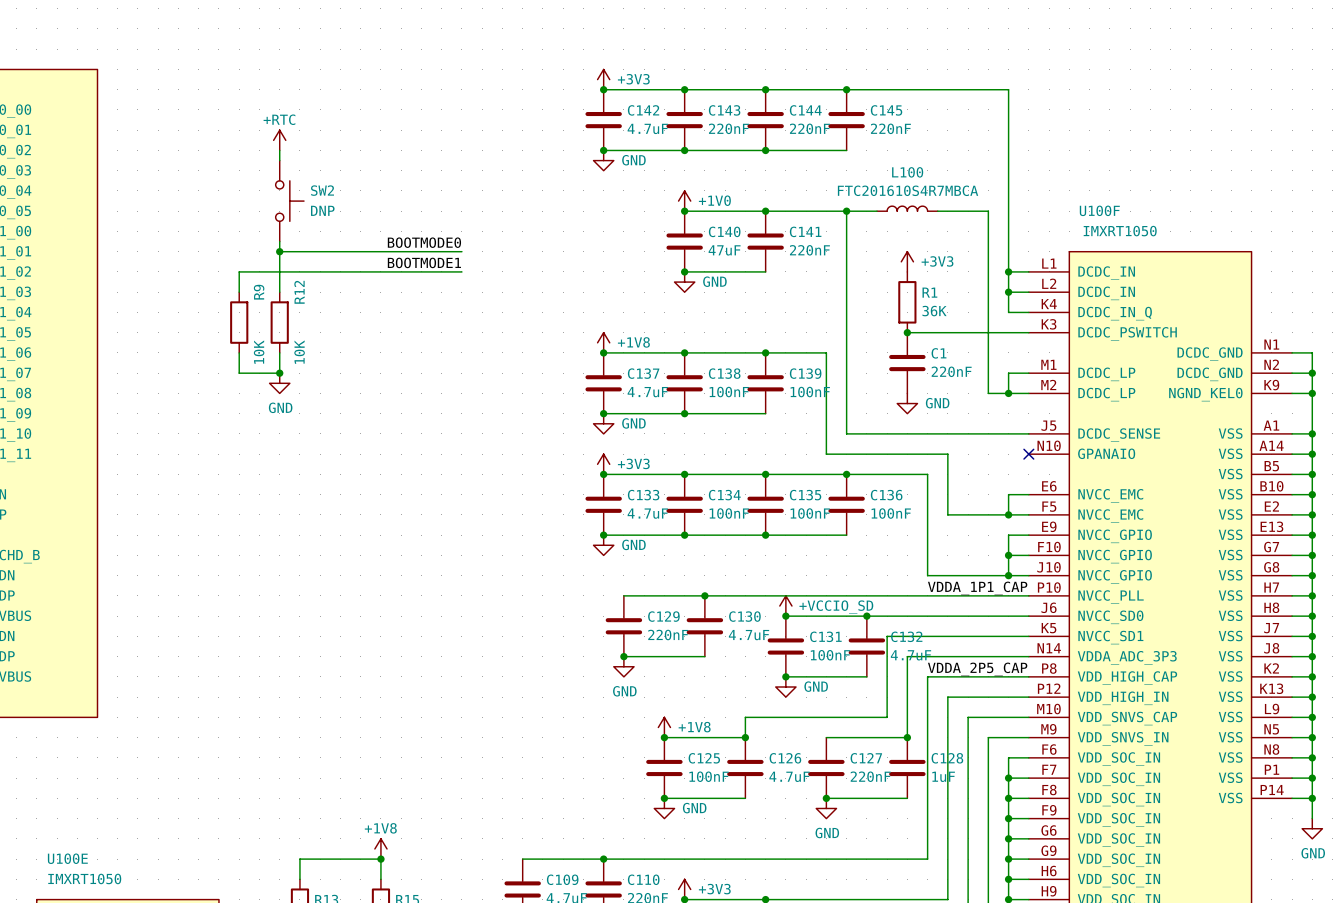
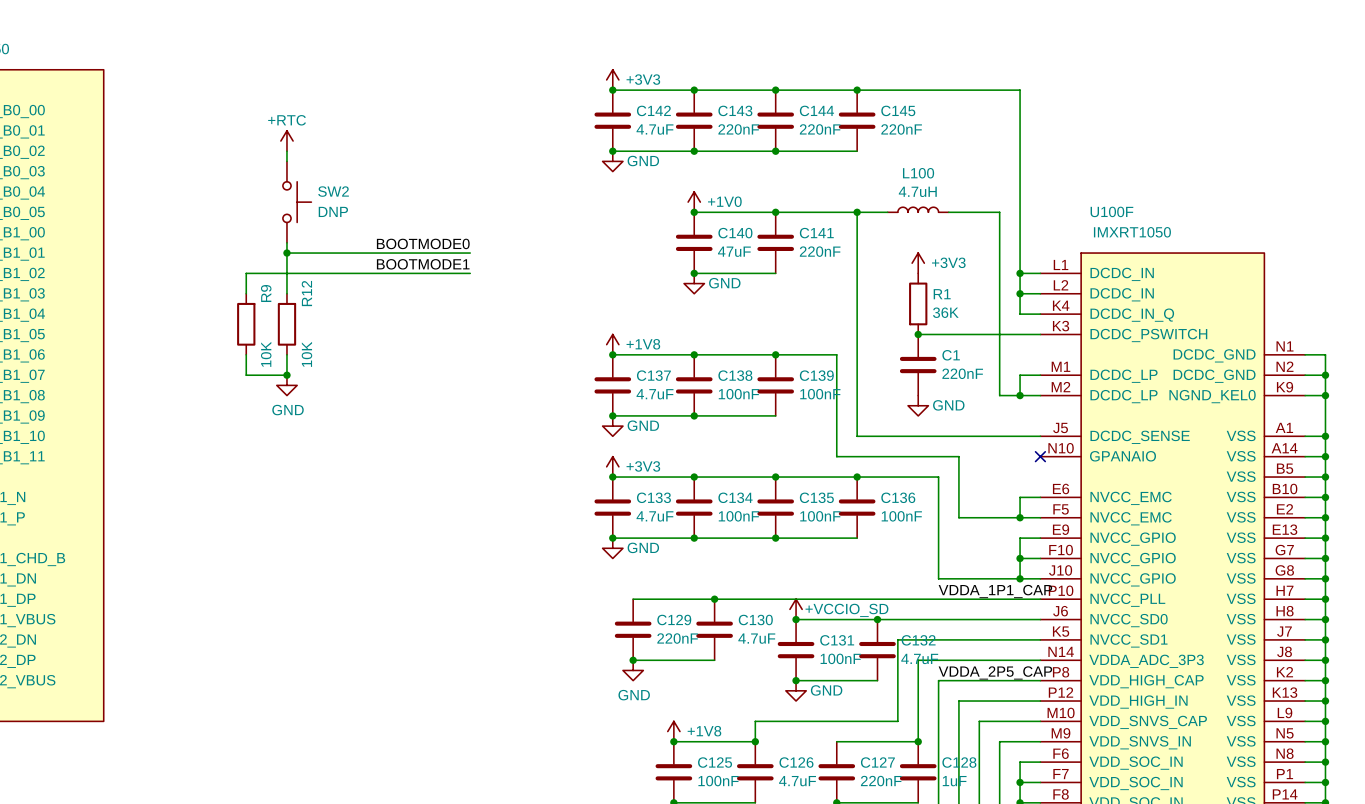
L100 value: FTC201610S4R7MBCA (908, 190) -> 4.7uH (917, 191)

